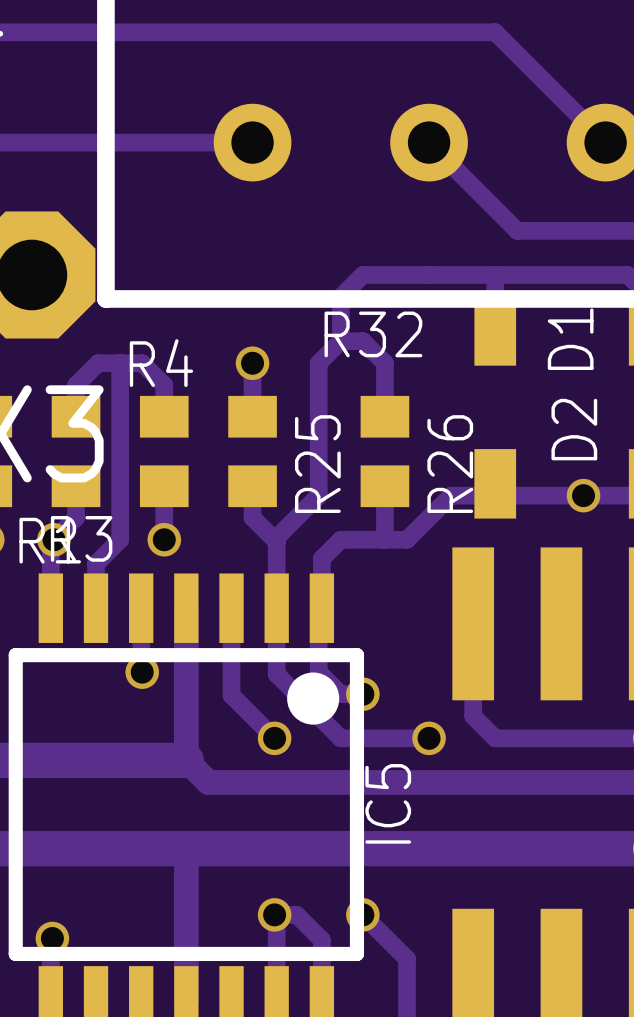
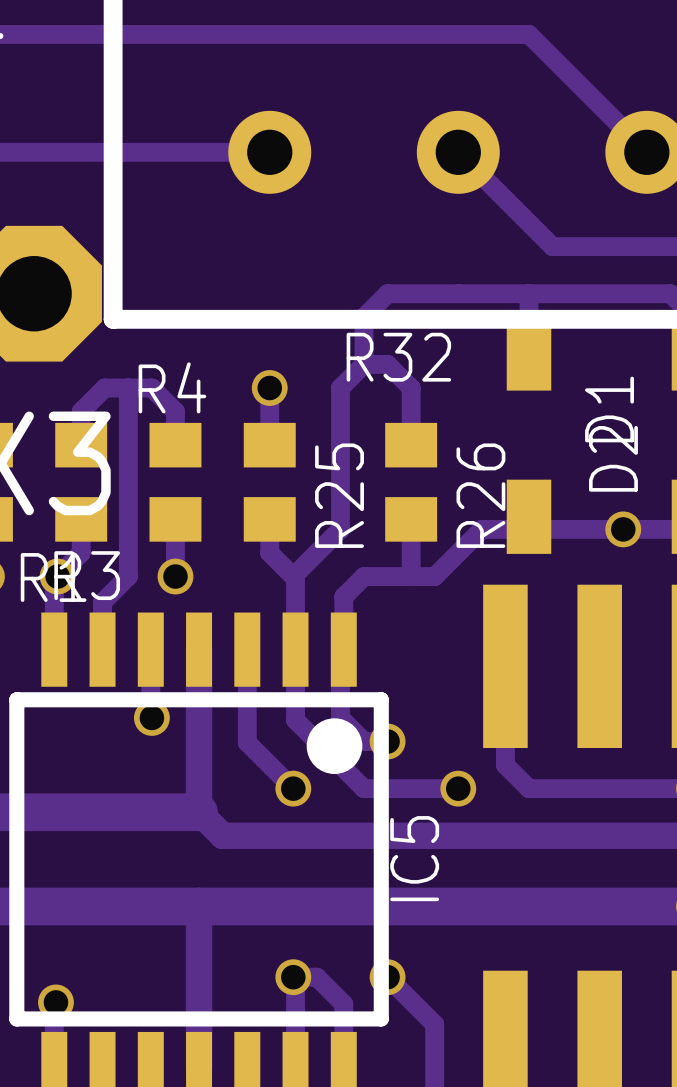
D1 name position: D1 (570, 339) -> D1 (609, 409)

